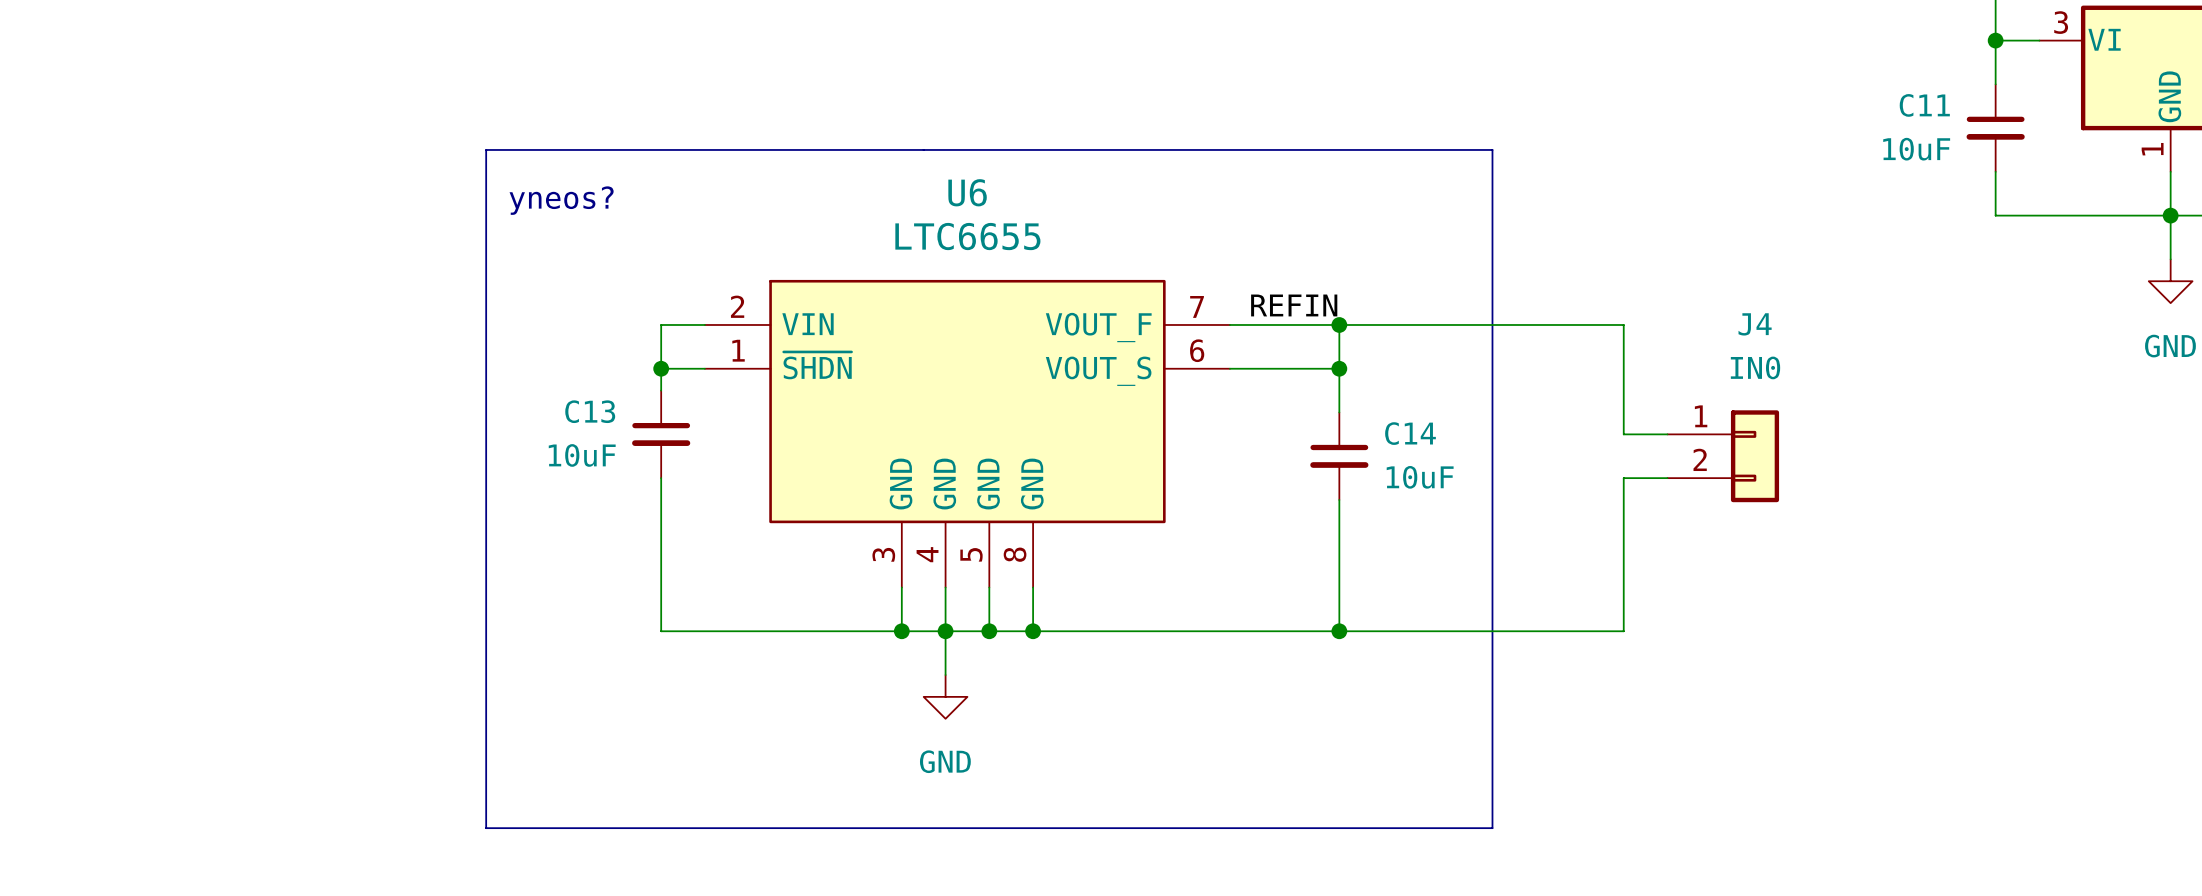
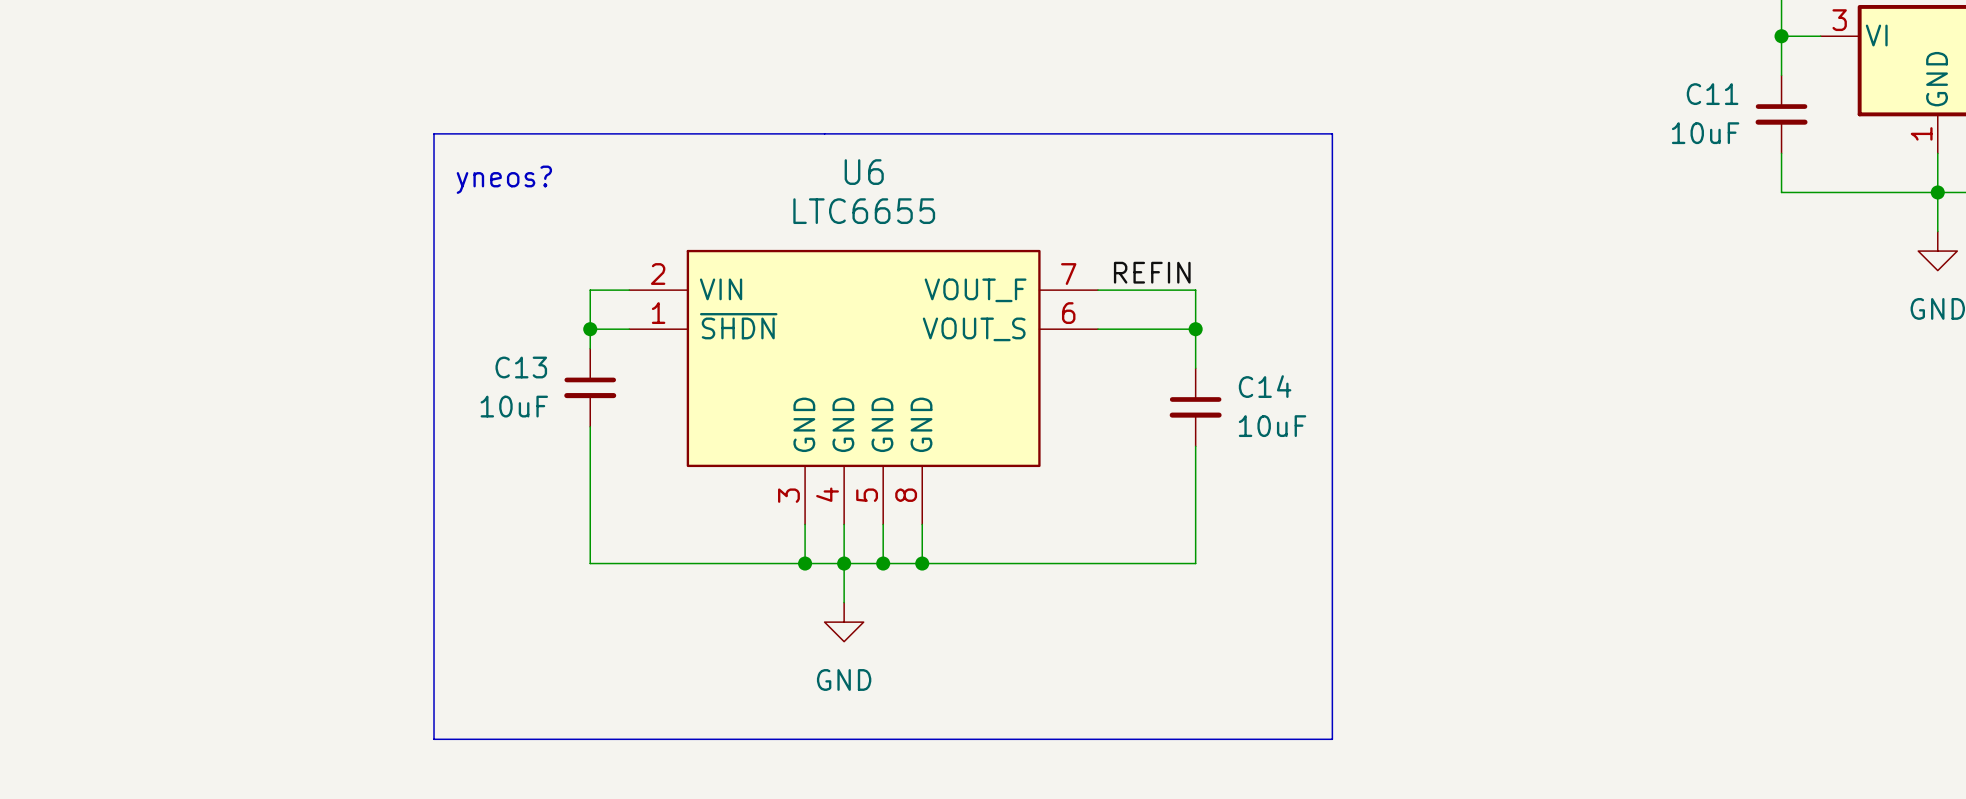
wire: (1339, 324) (1623, 324) (1623, 434) (1667, 434) -> none
junction: (1339, 324) -> none
J4: IN0 (1723, 456) -> none
wire: (1667, 478) (1623, 478) (1623, 631) (1339, 631) -> none
junction: (1339, 631) -> none

